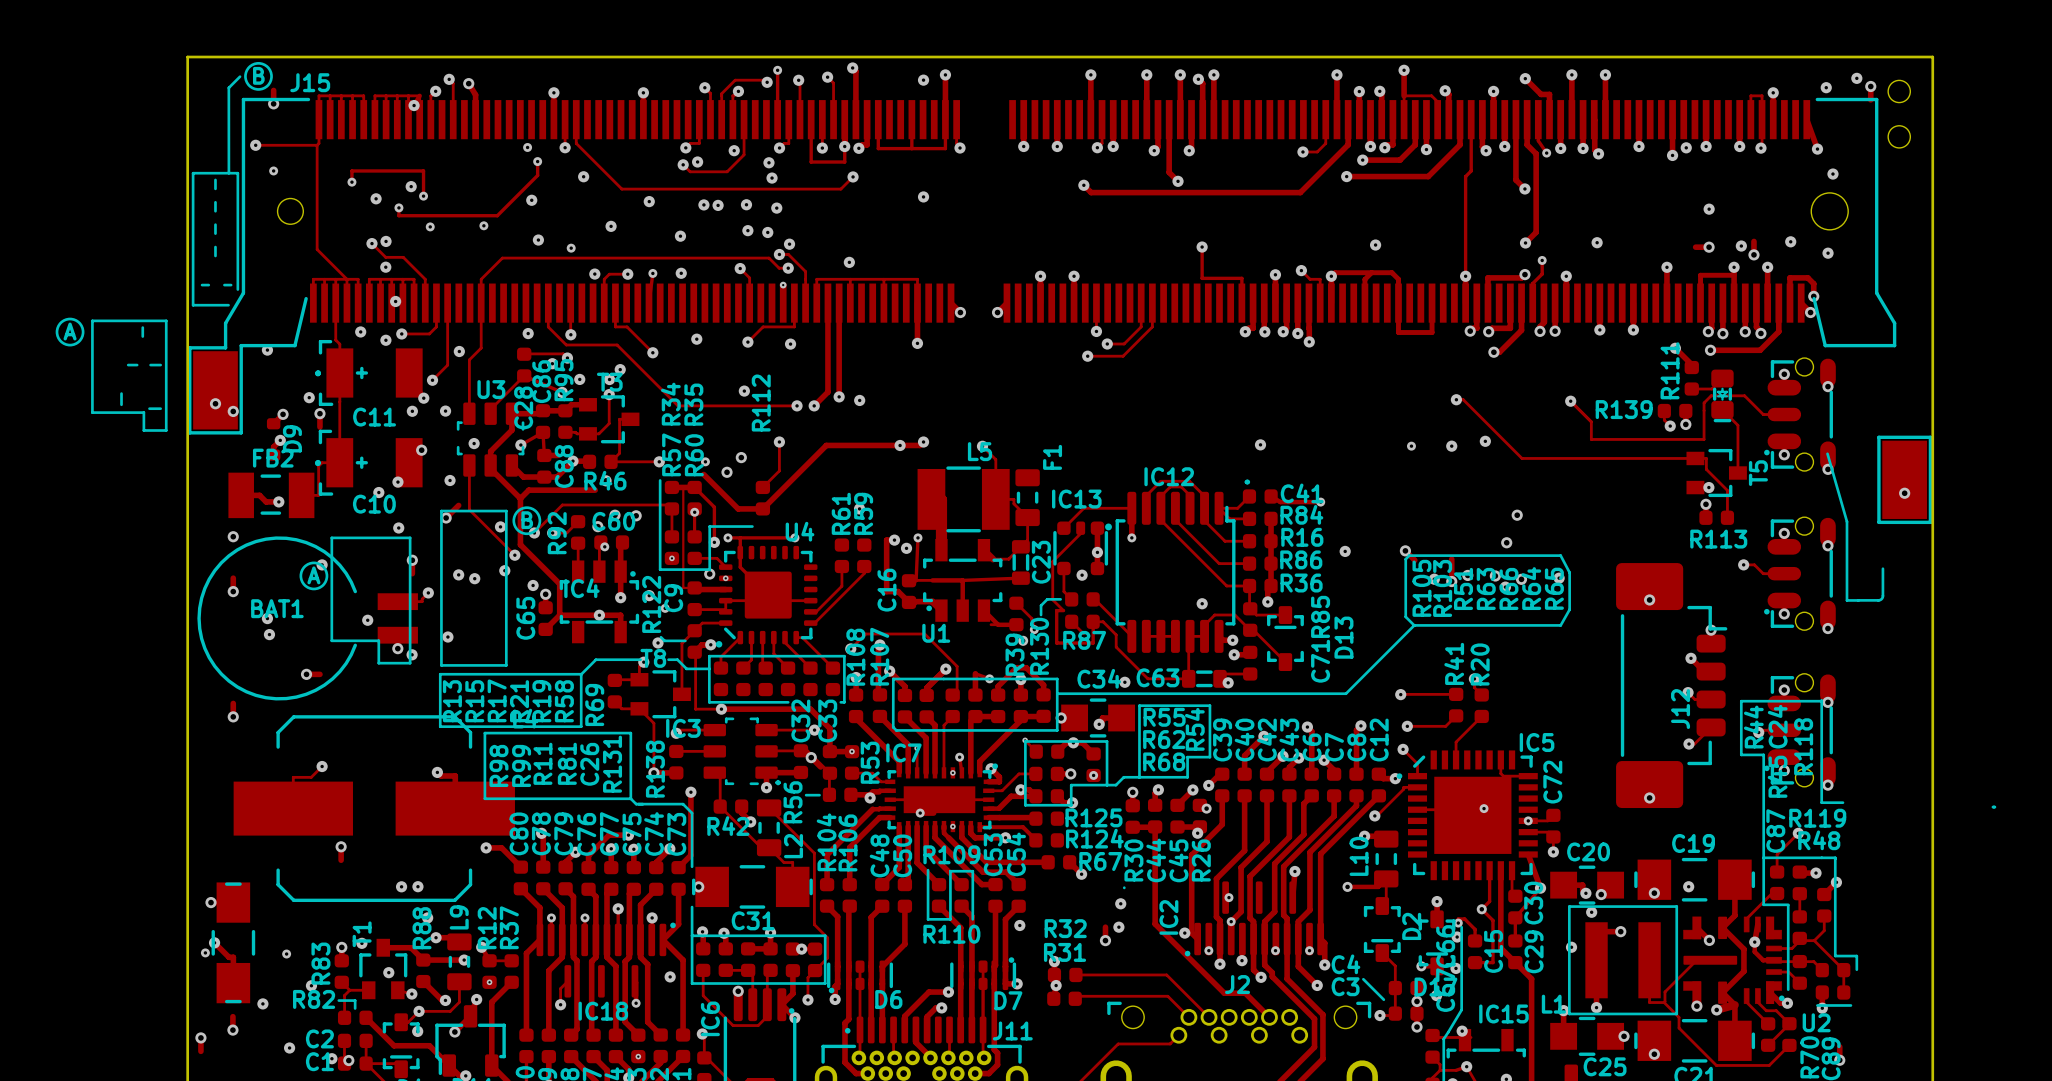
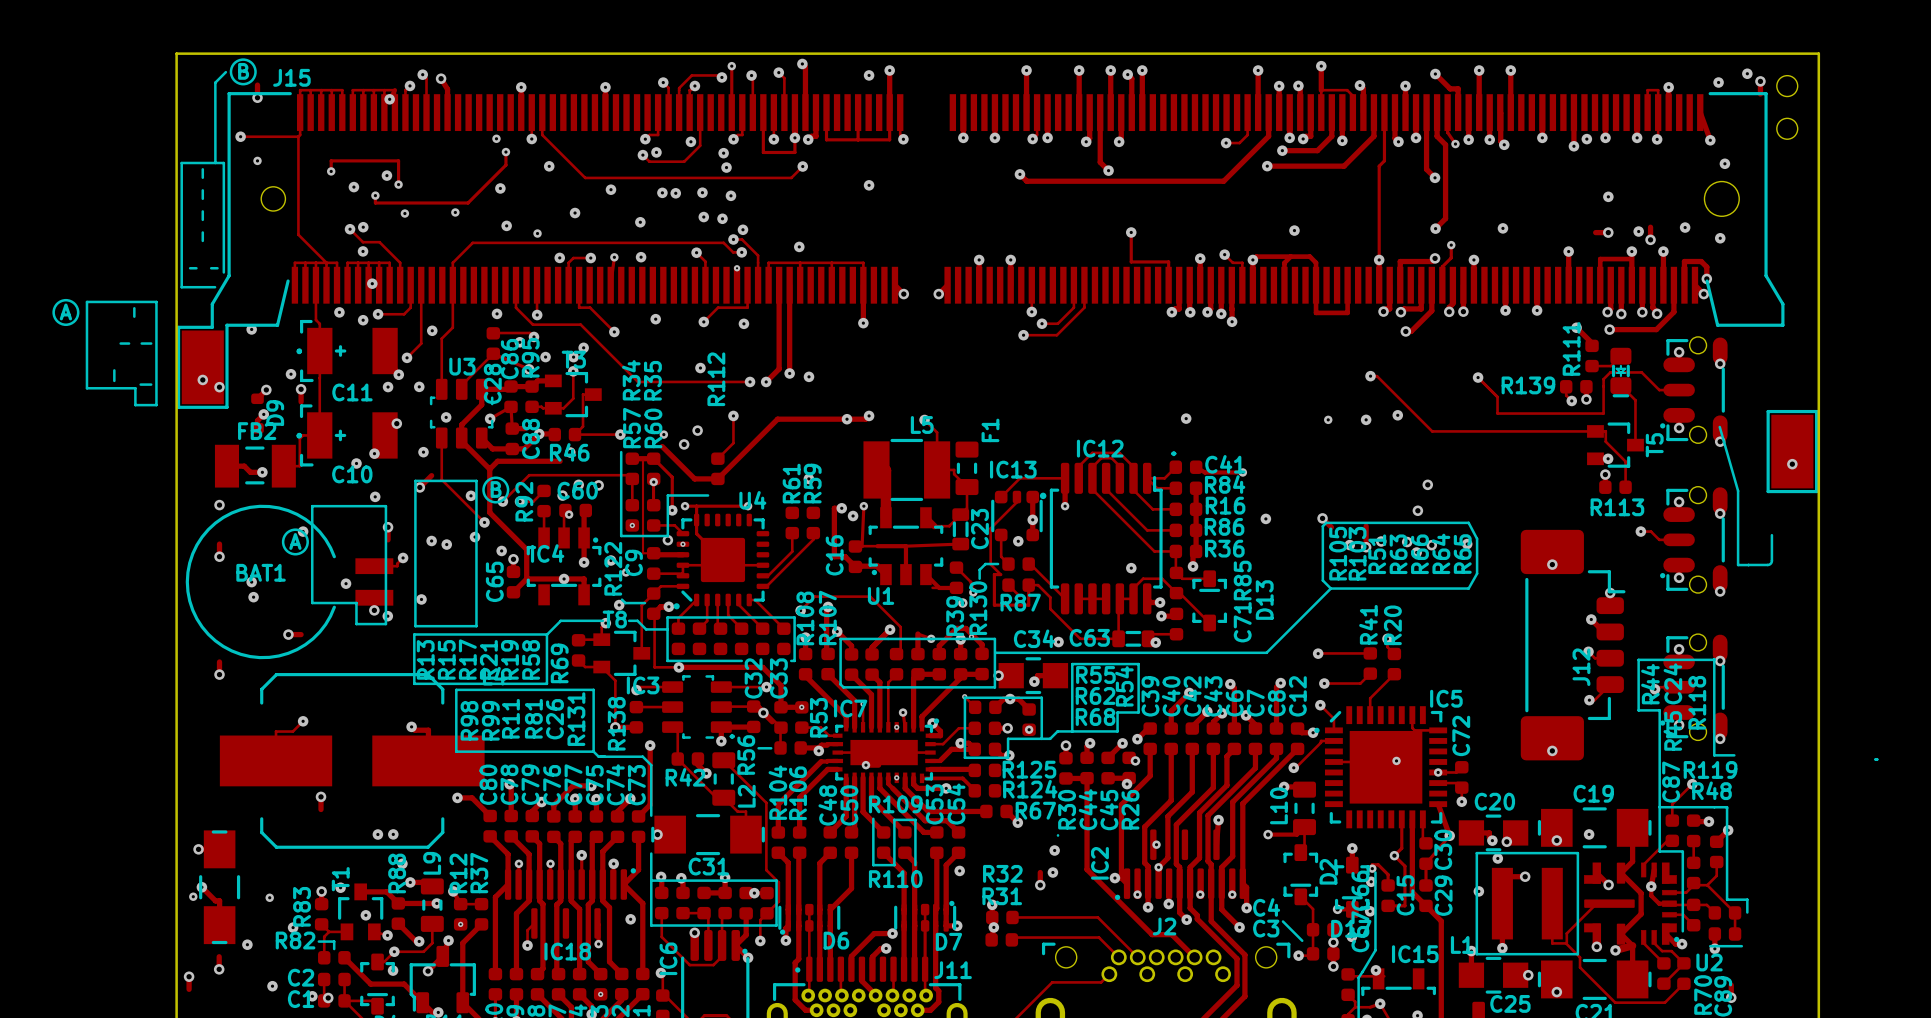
via: none -> (971, 636)

